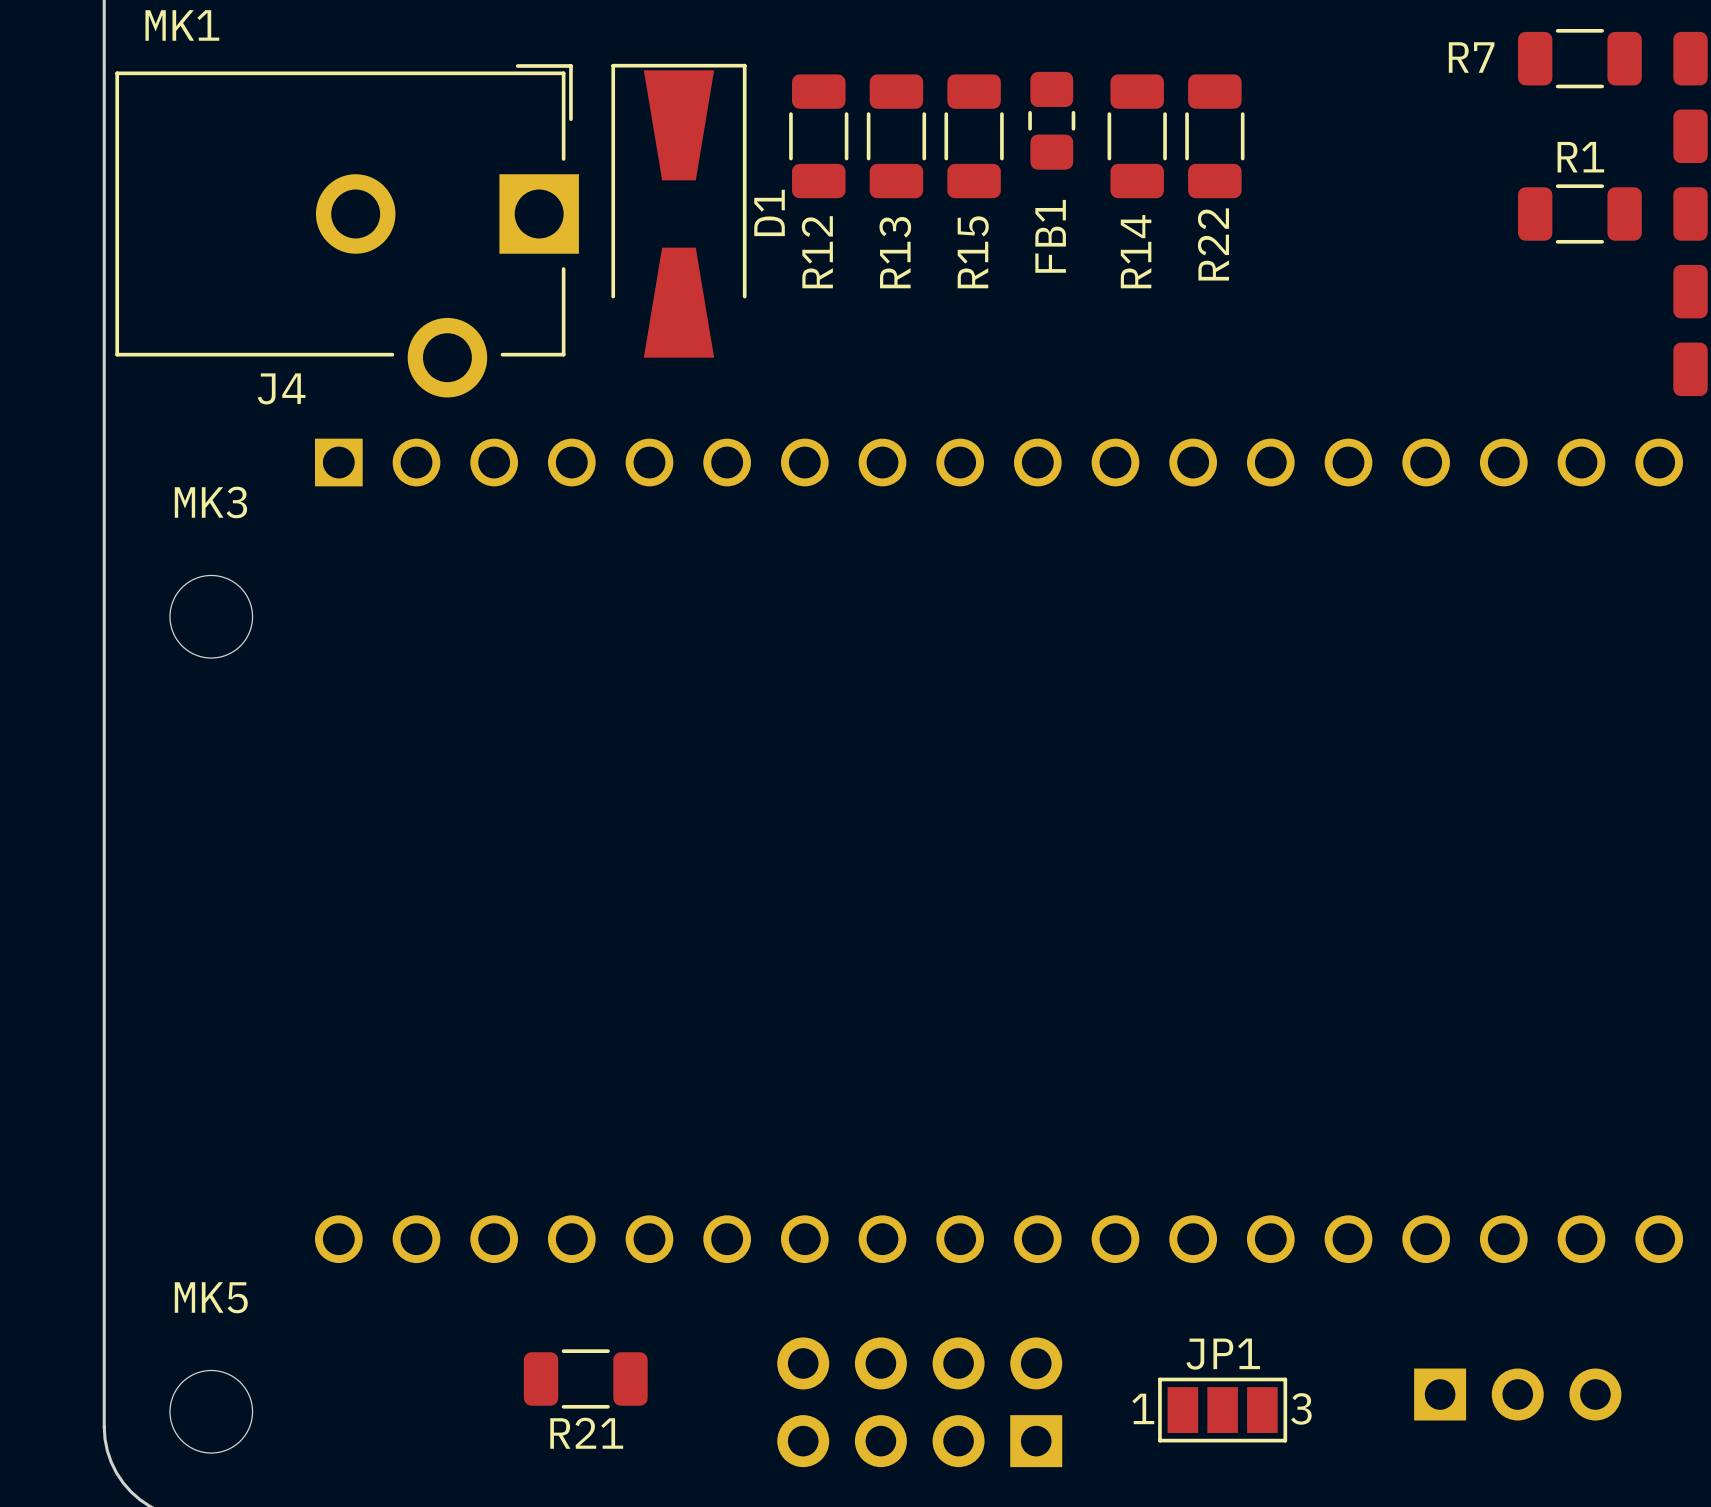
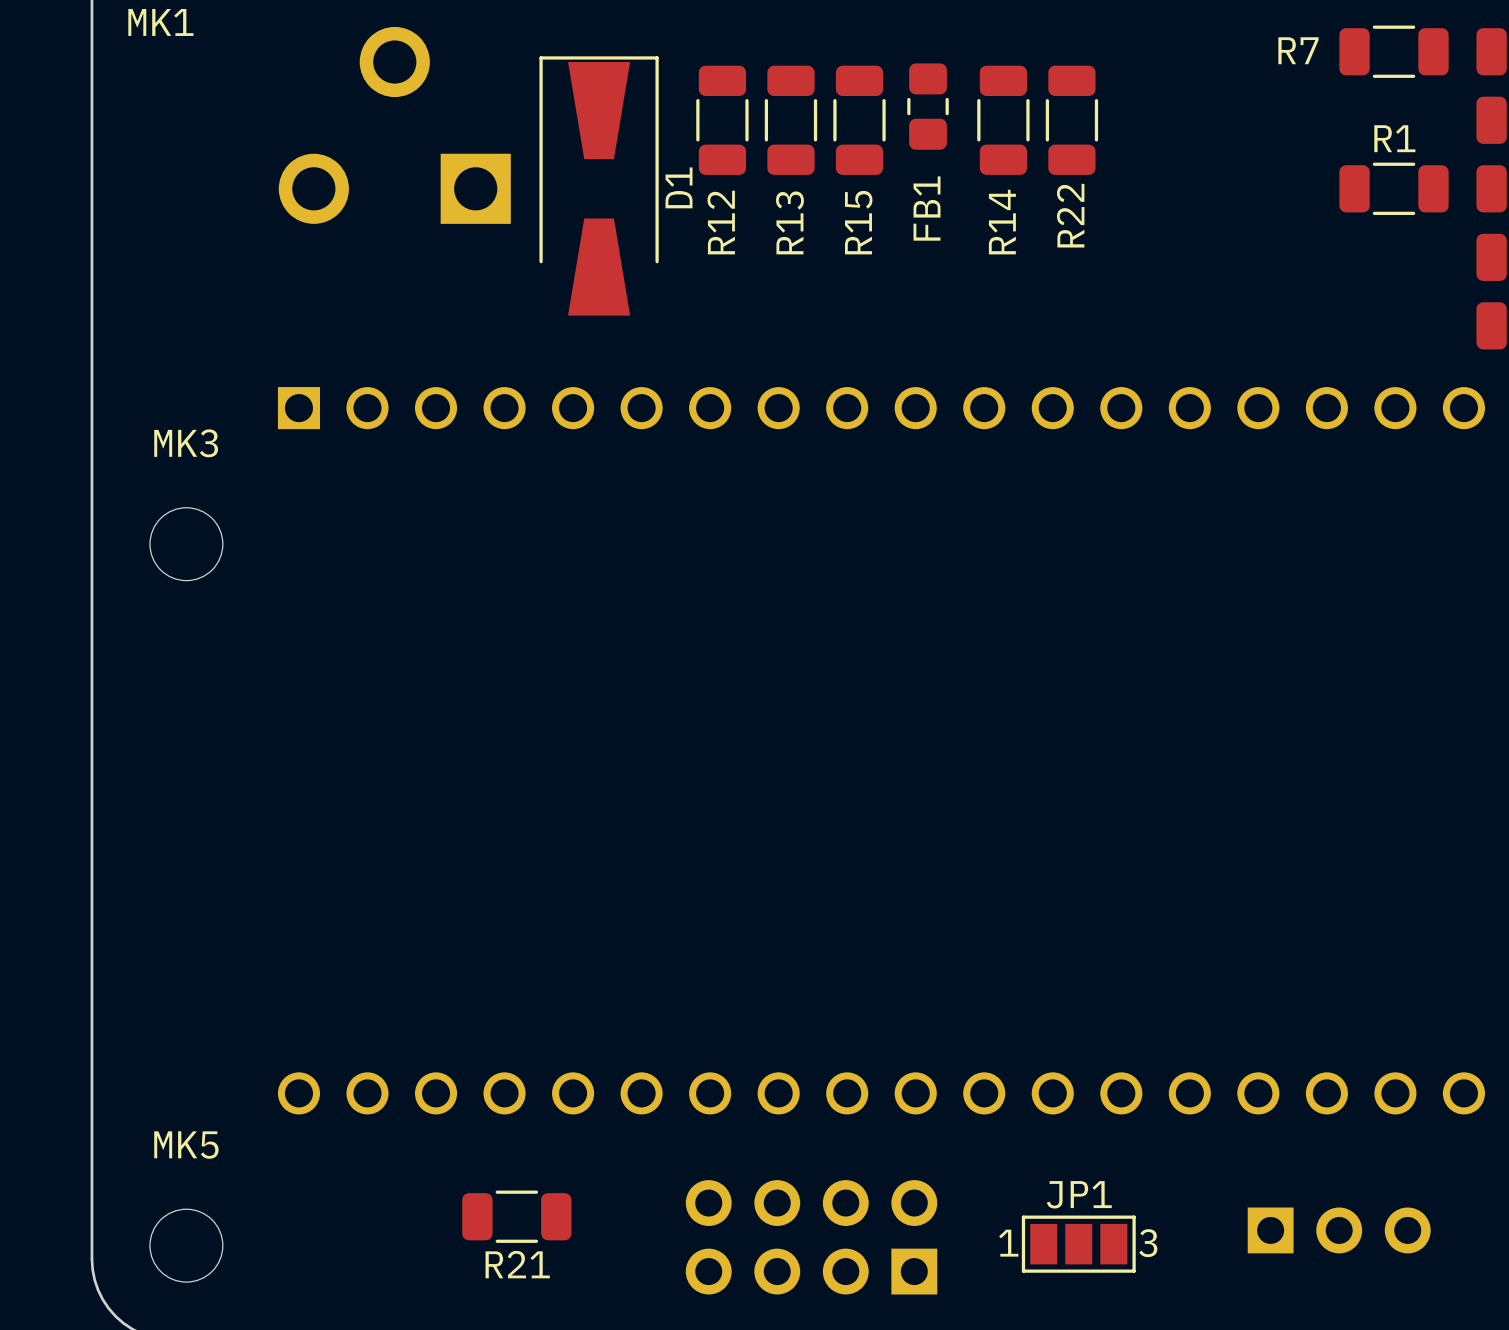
J4 side: top (347, 230) -> bottom (394, 125)

